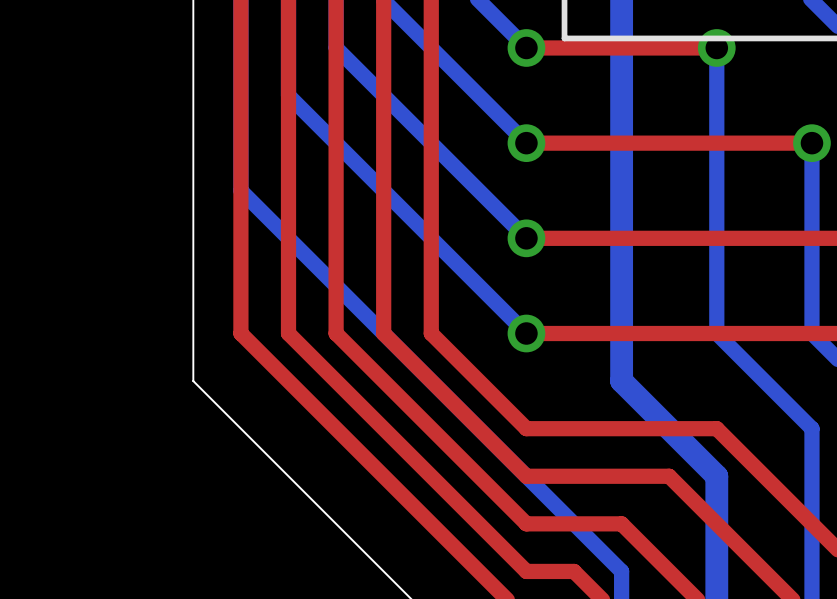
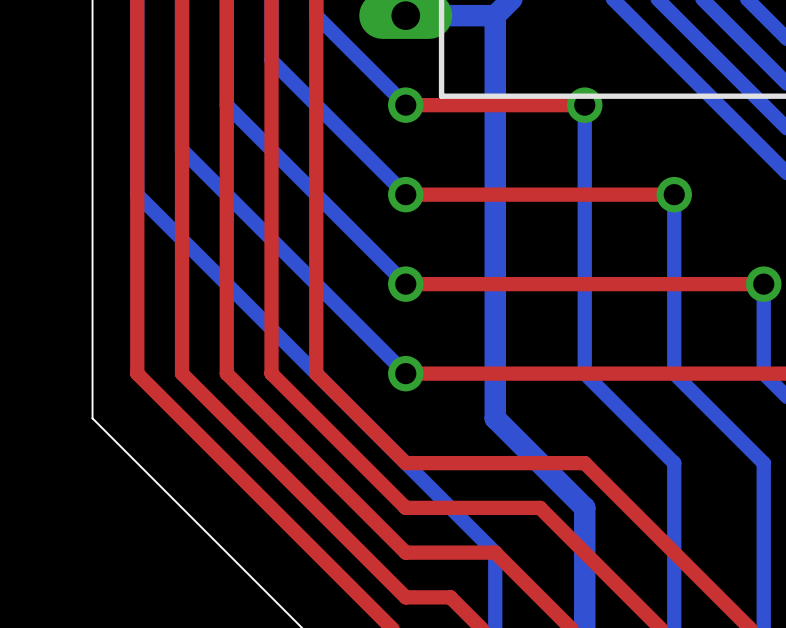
bottom track: (240, 143) (240, 190) (621, 571) -> (137, 194) (495, 552) (495, 597)

